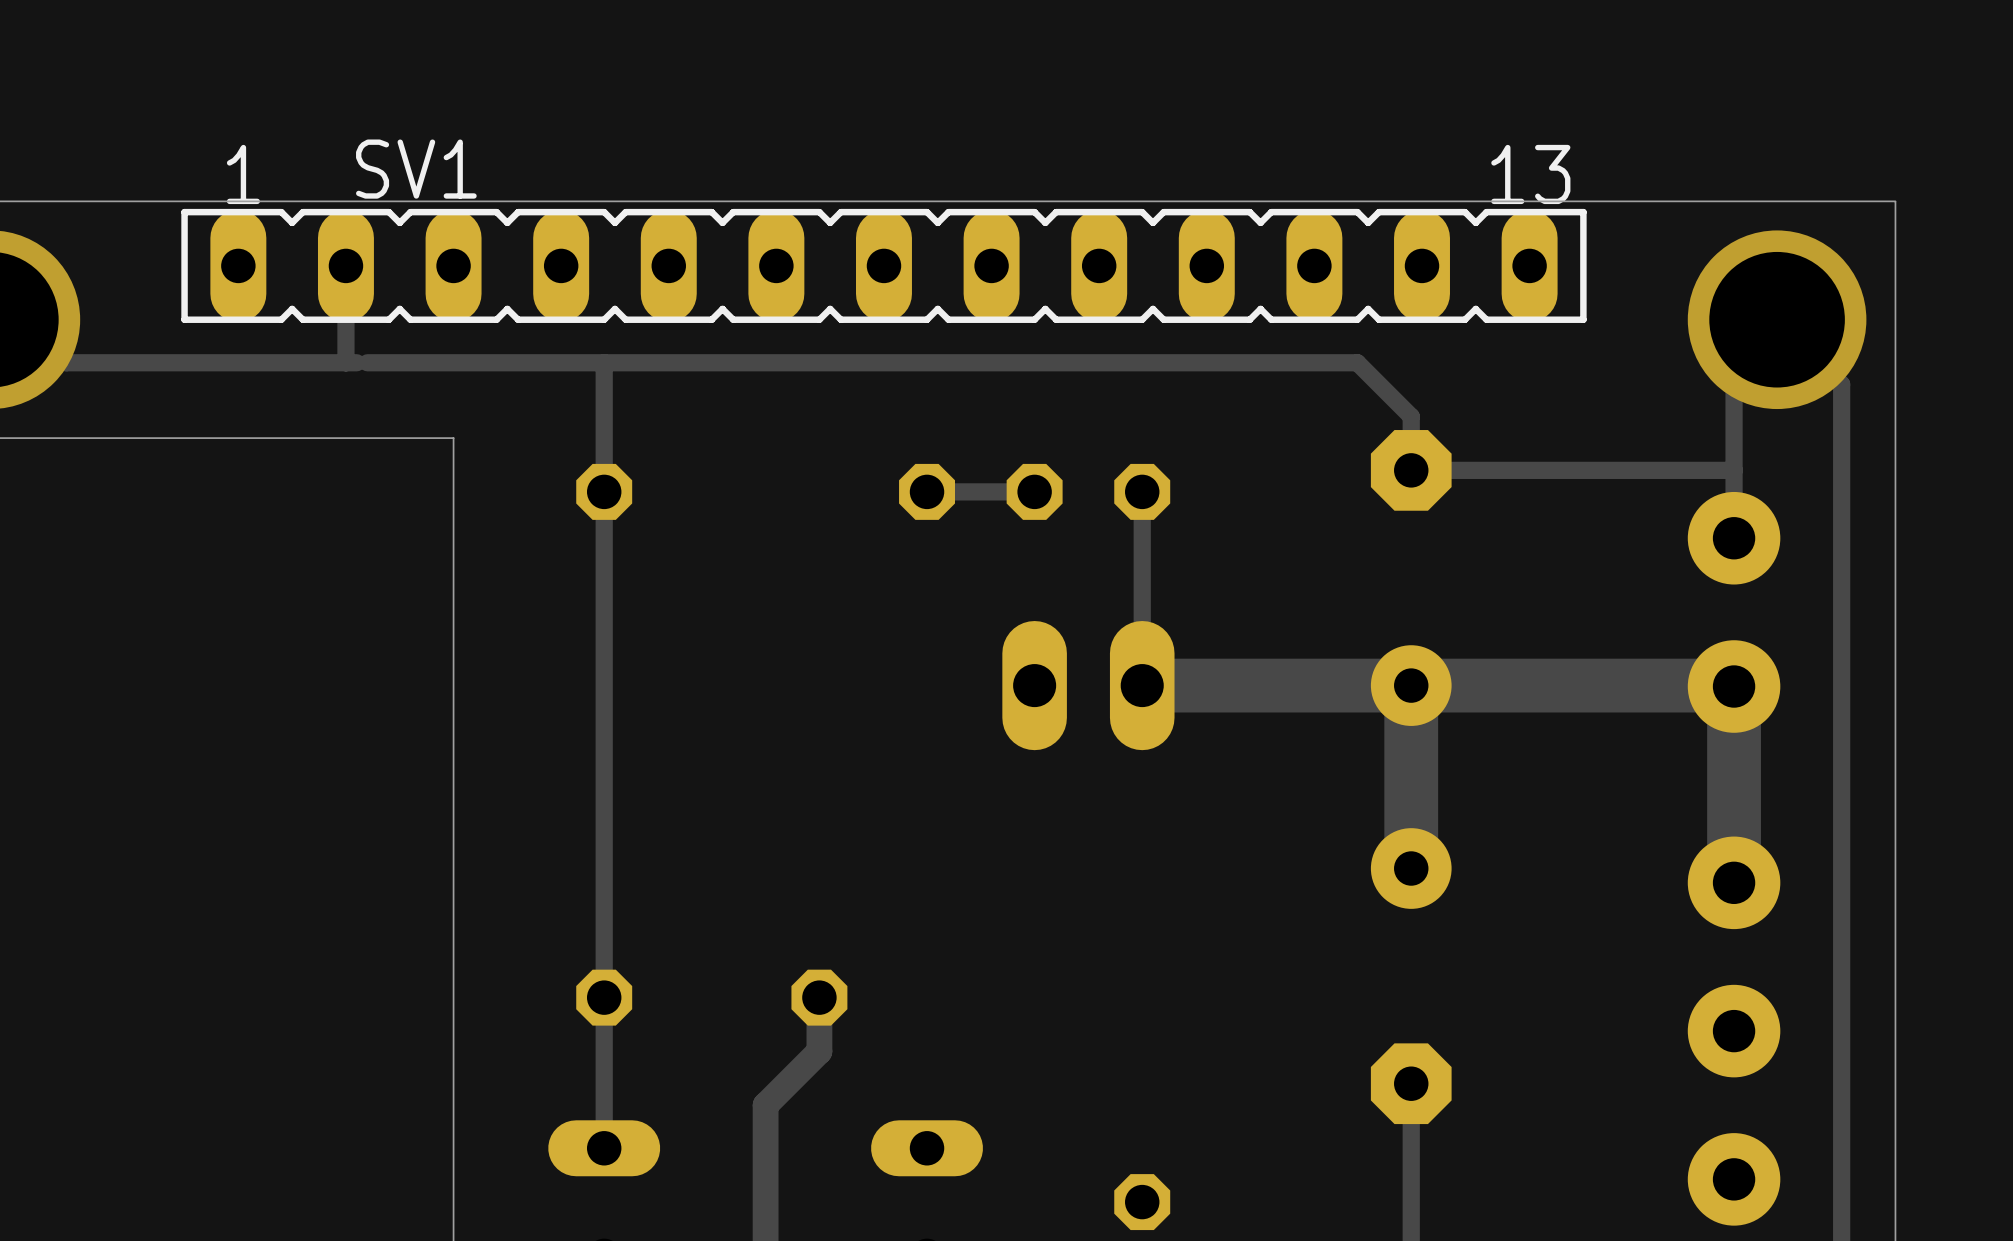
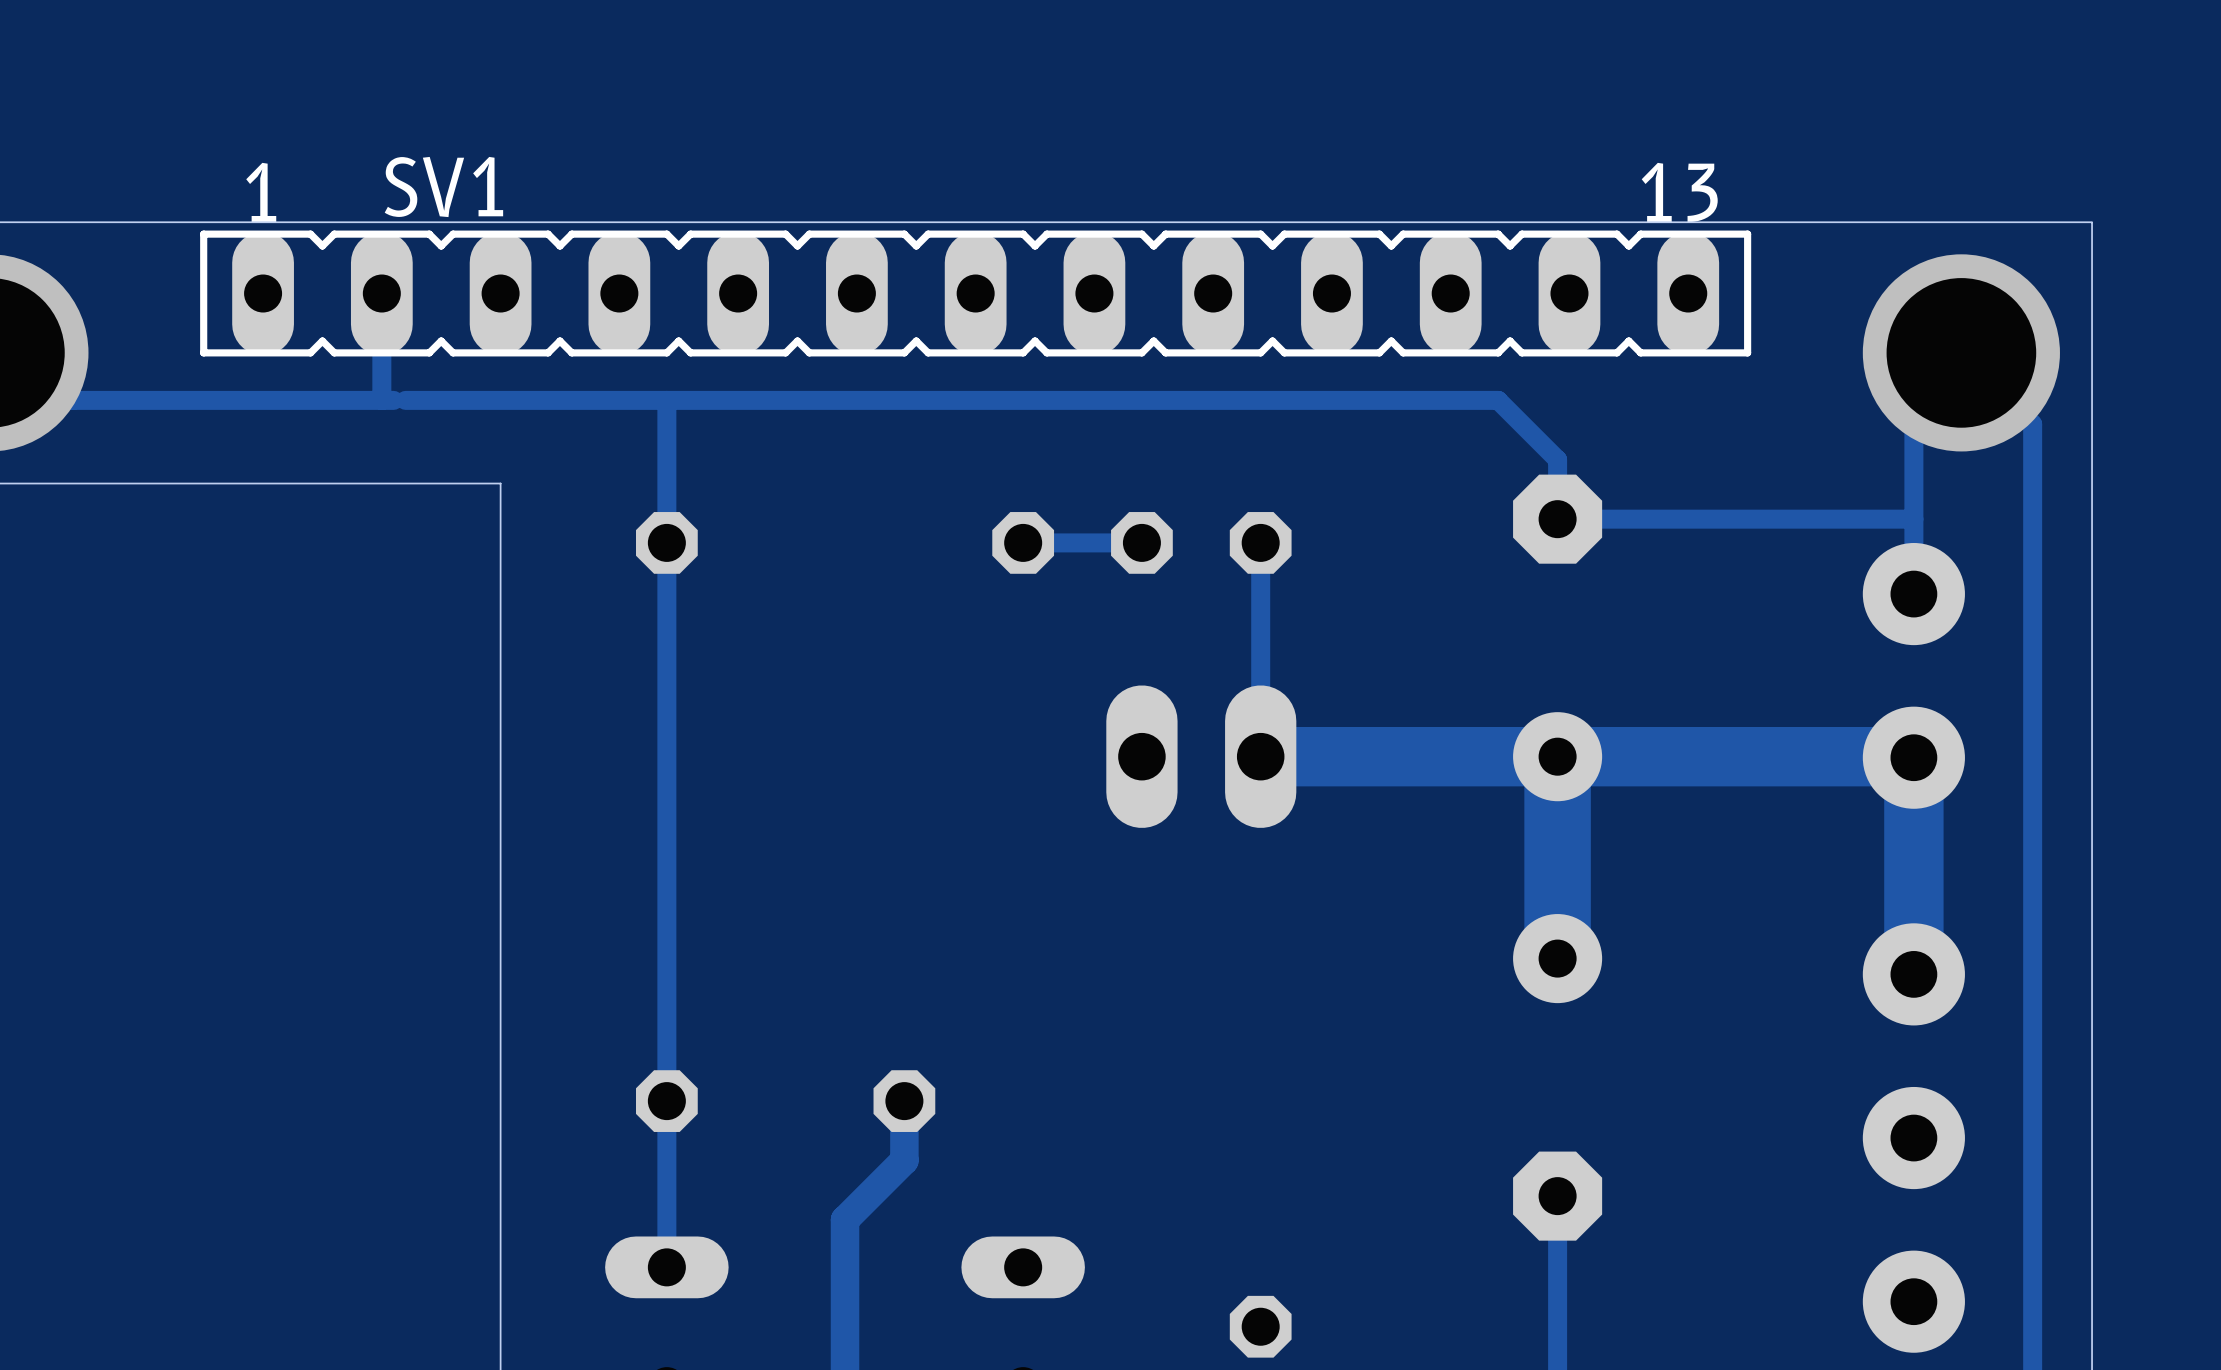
track width: thin (1411, 685) (1411, 868) -> thick (1557, 756) (1557, 958)

